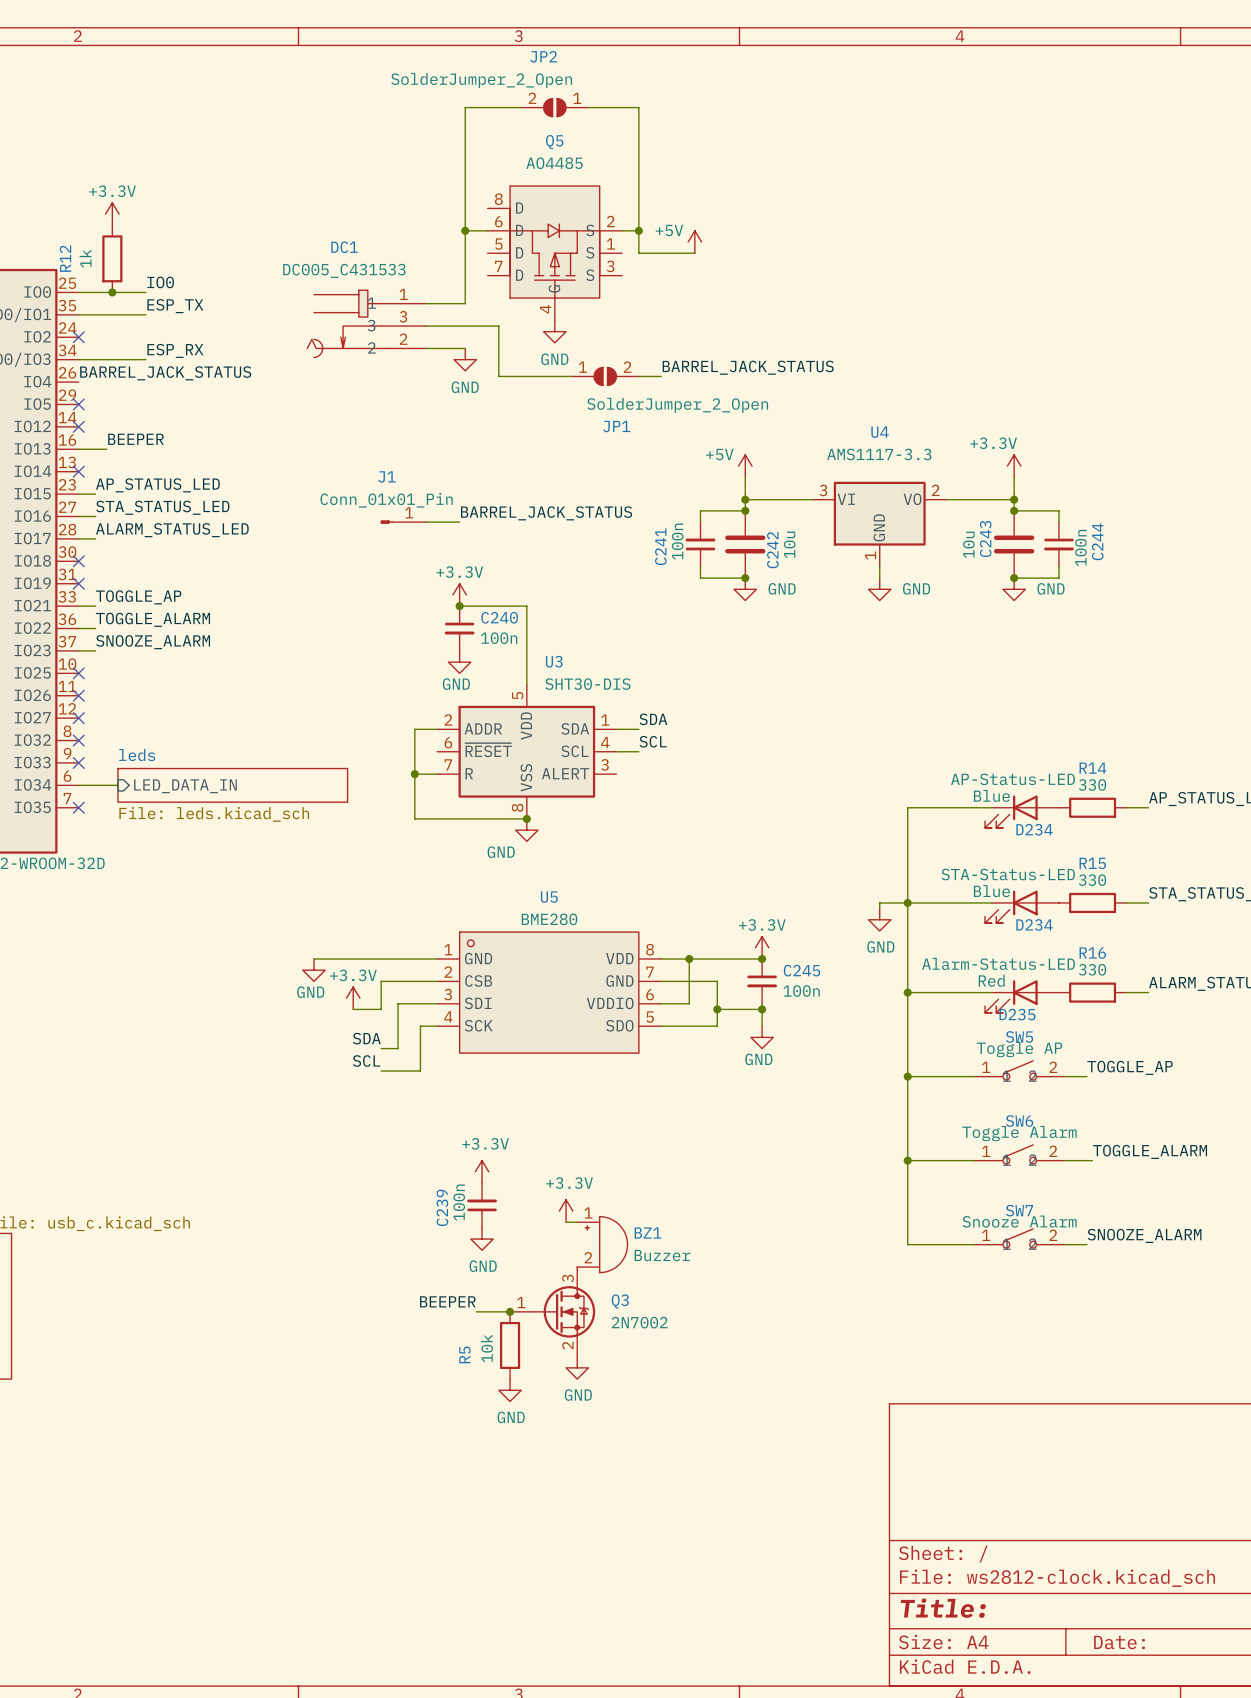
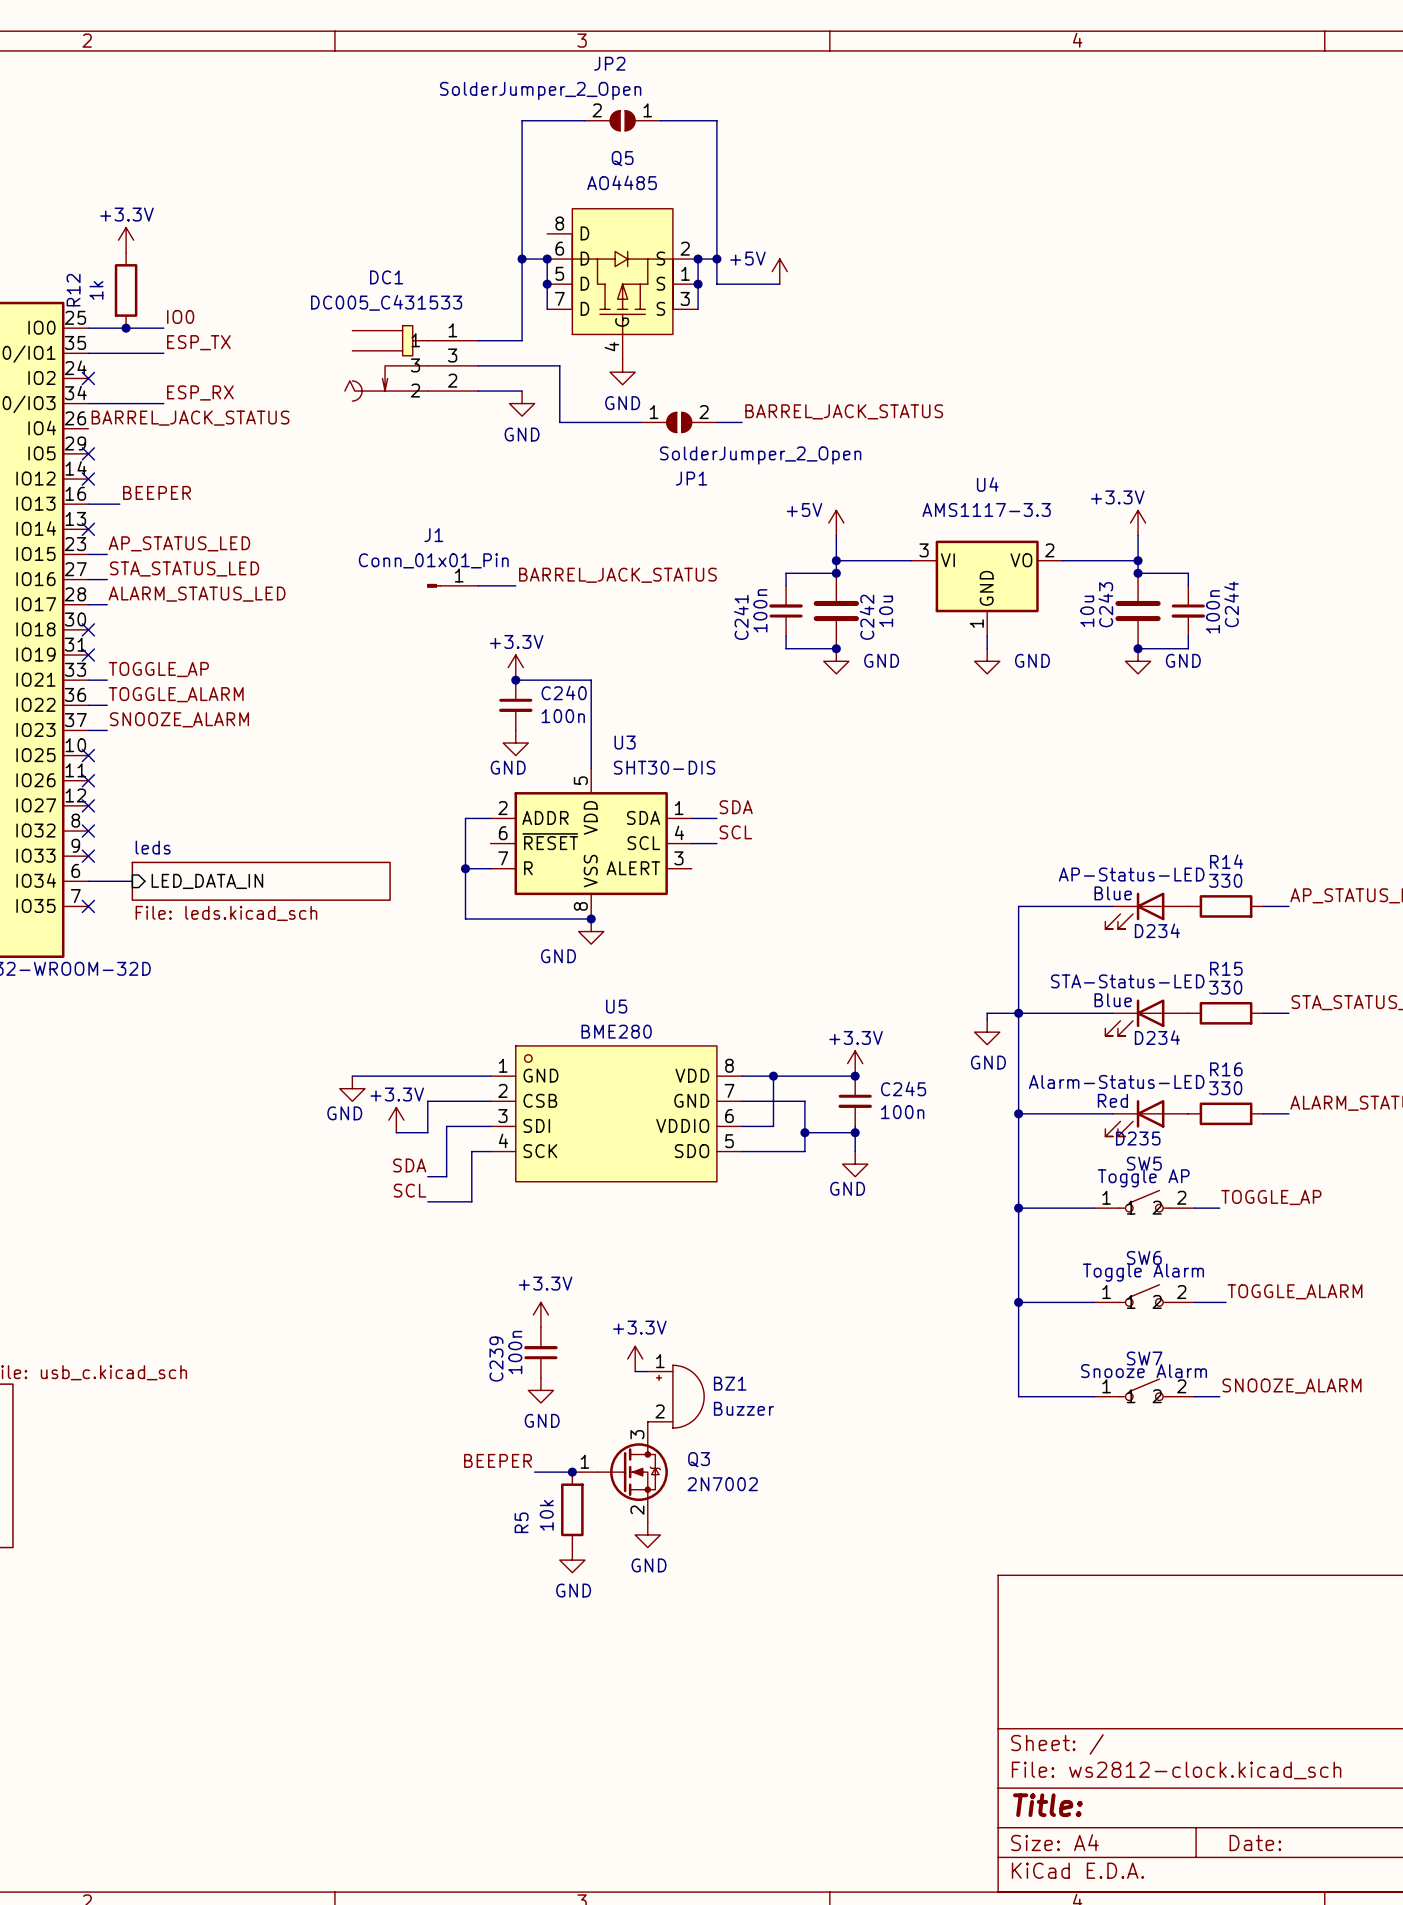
wire: none -> (547, 259) (547, 309)
junction: none -> (547, 259)
wire: none -> (698, 259) (698, 309)
junction: none -> (698, 259)
junction: none -> (547, 284)
junction: none -> (698, 284)

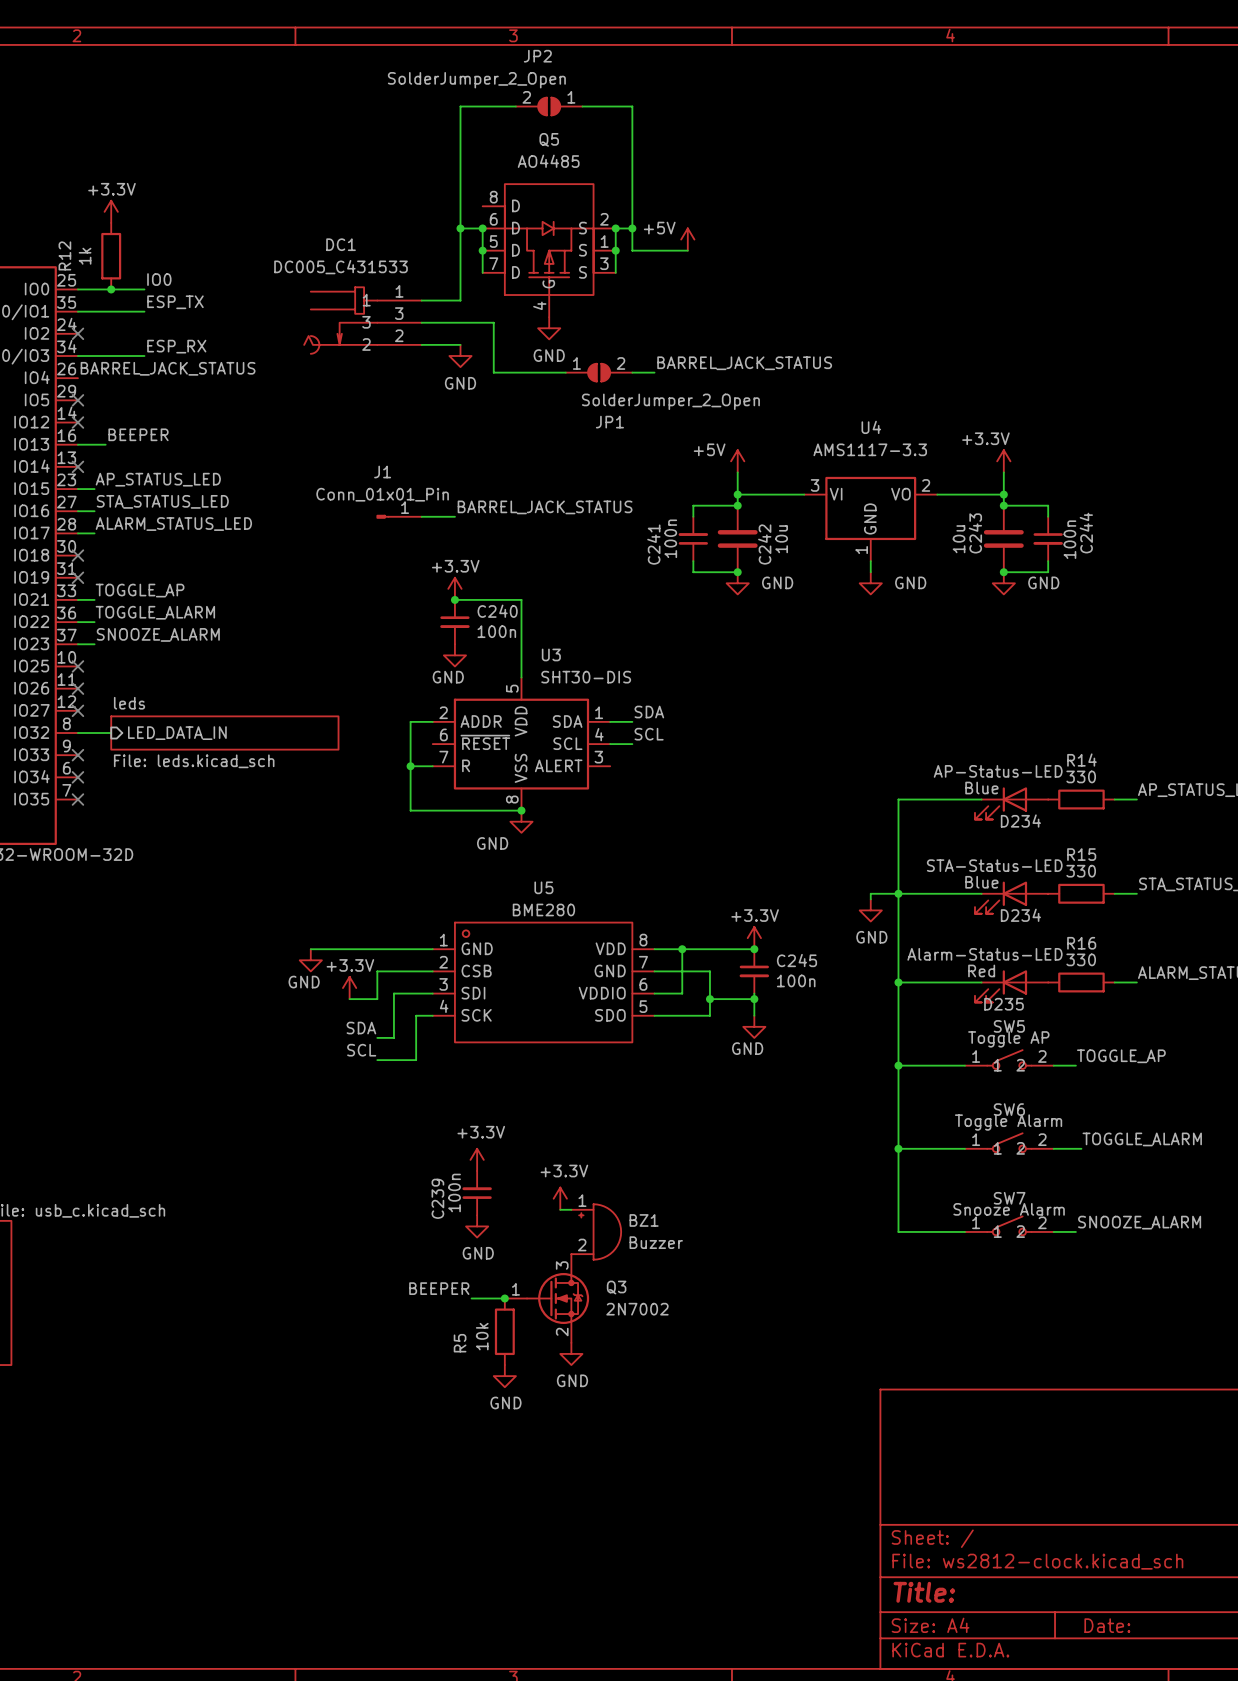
wire: none -> (77, 733) (111, 733)
no-connect mark position: (88, 831) -> (77, 777)
wire: (88, 881) (132, 881) -> none
sheet pin position: LED_DATA_IN (207, 881) -> LED_DATA_IN (177, 733)
sheet leds position: (261, 881) -> (224, 733)

